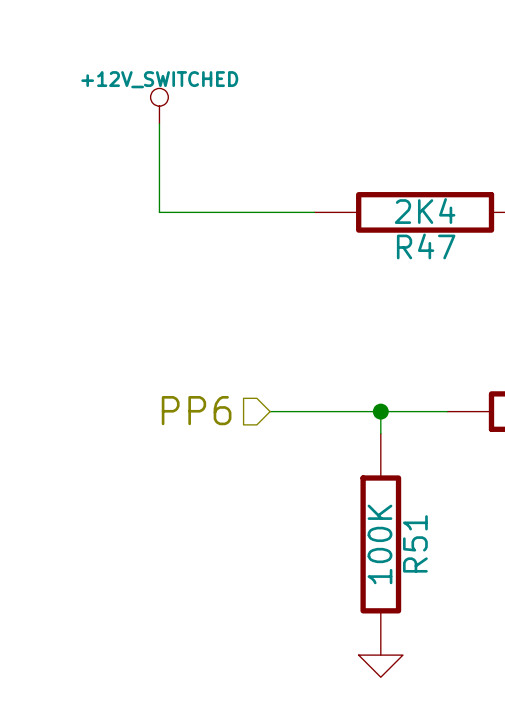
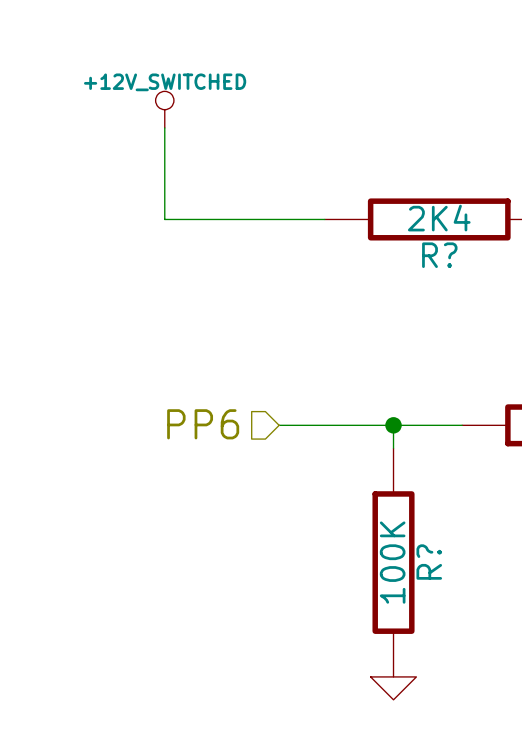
R47 name: R47 (426, 246) -> R? (439, 255)
R51 name: R51 (415, 543) -> R? (429, 562)

